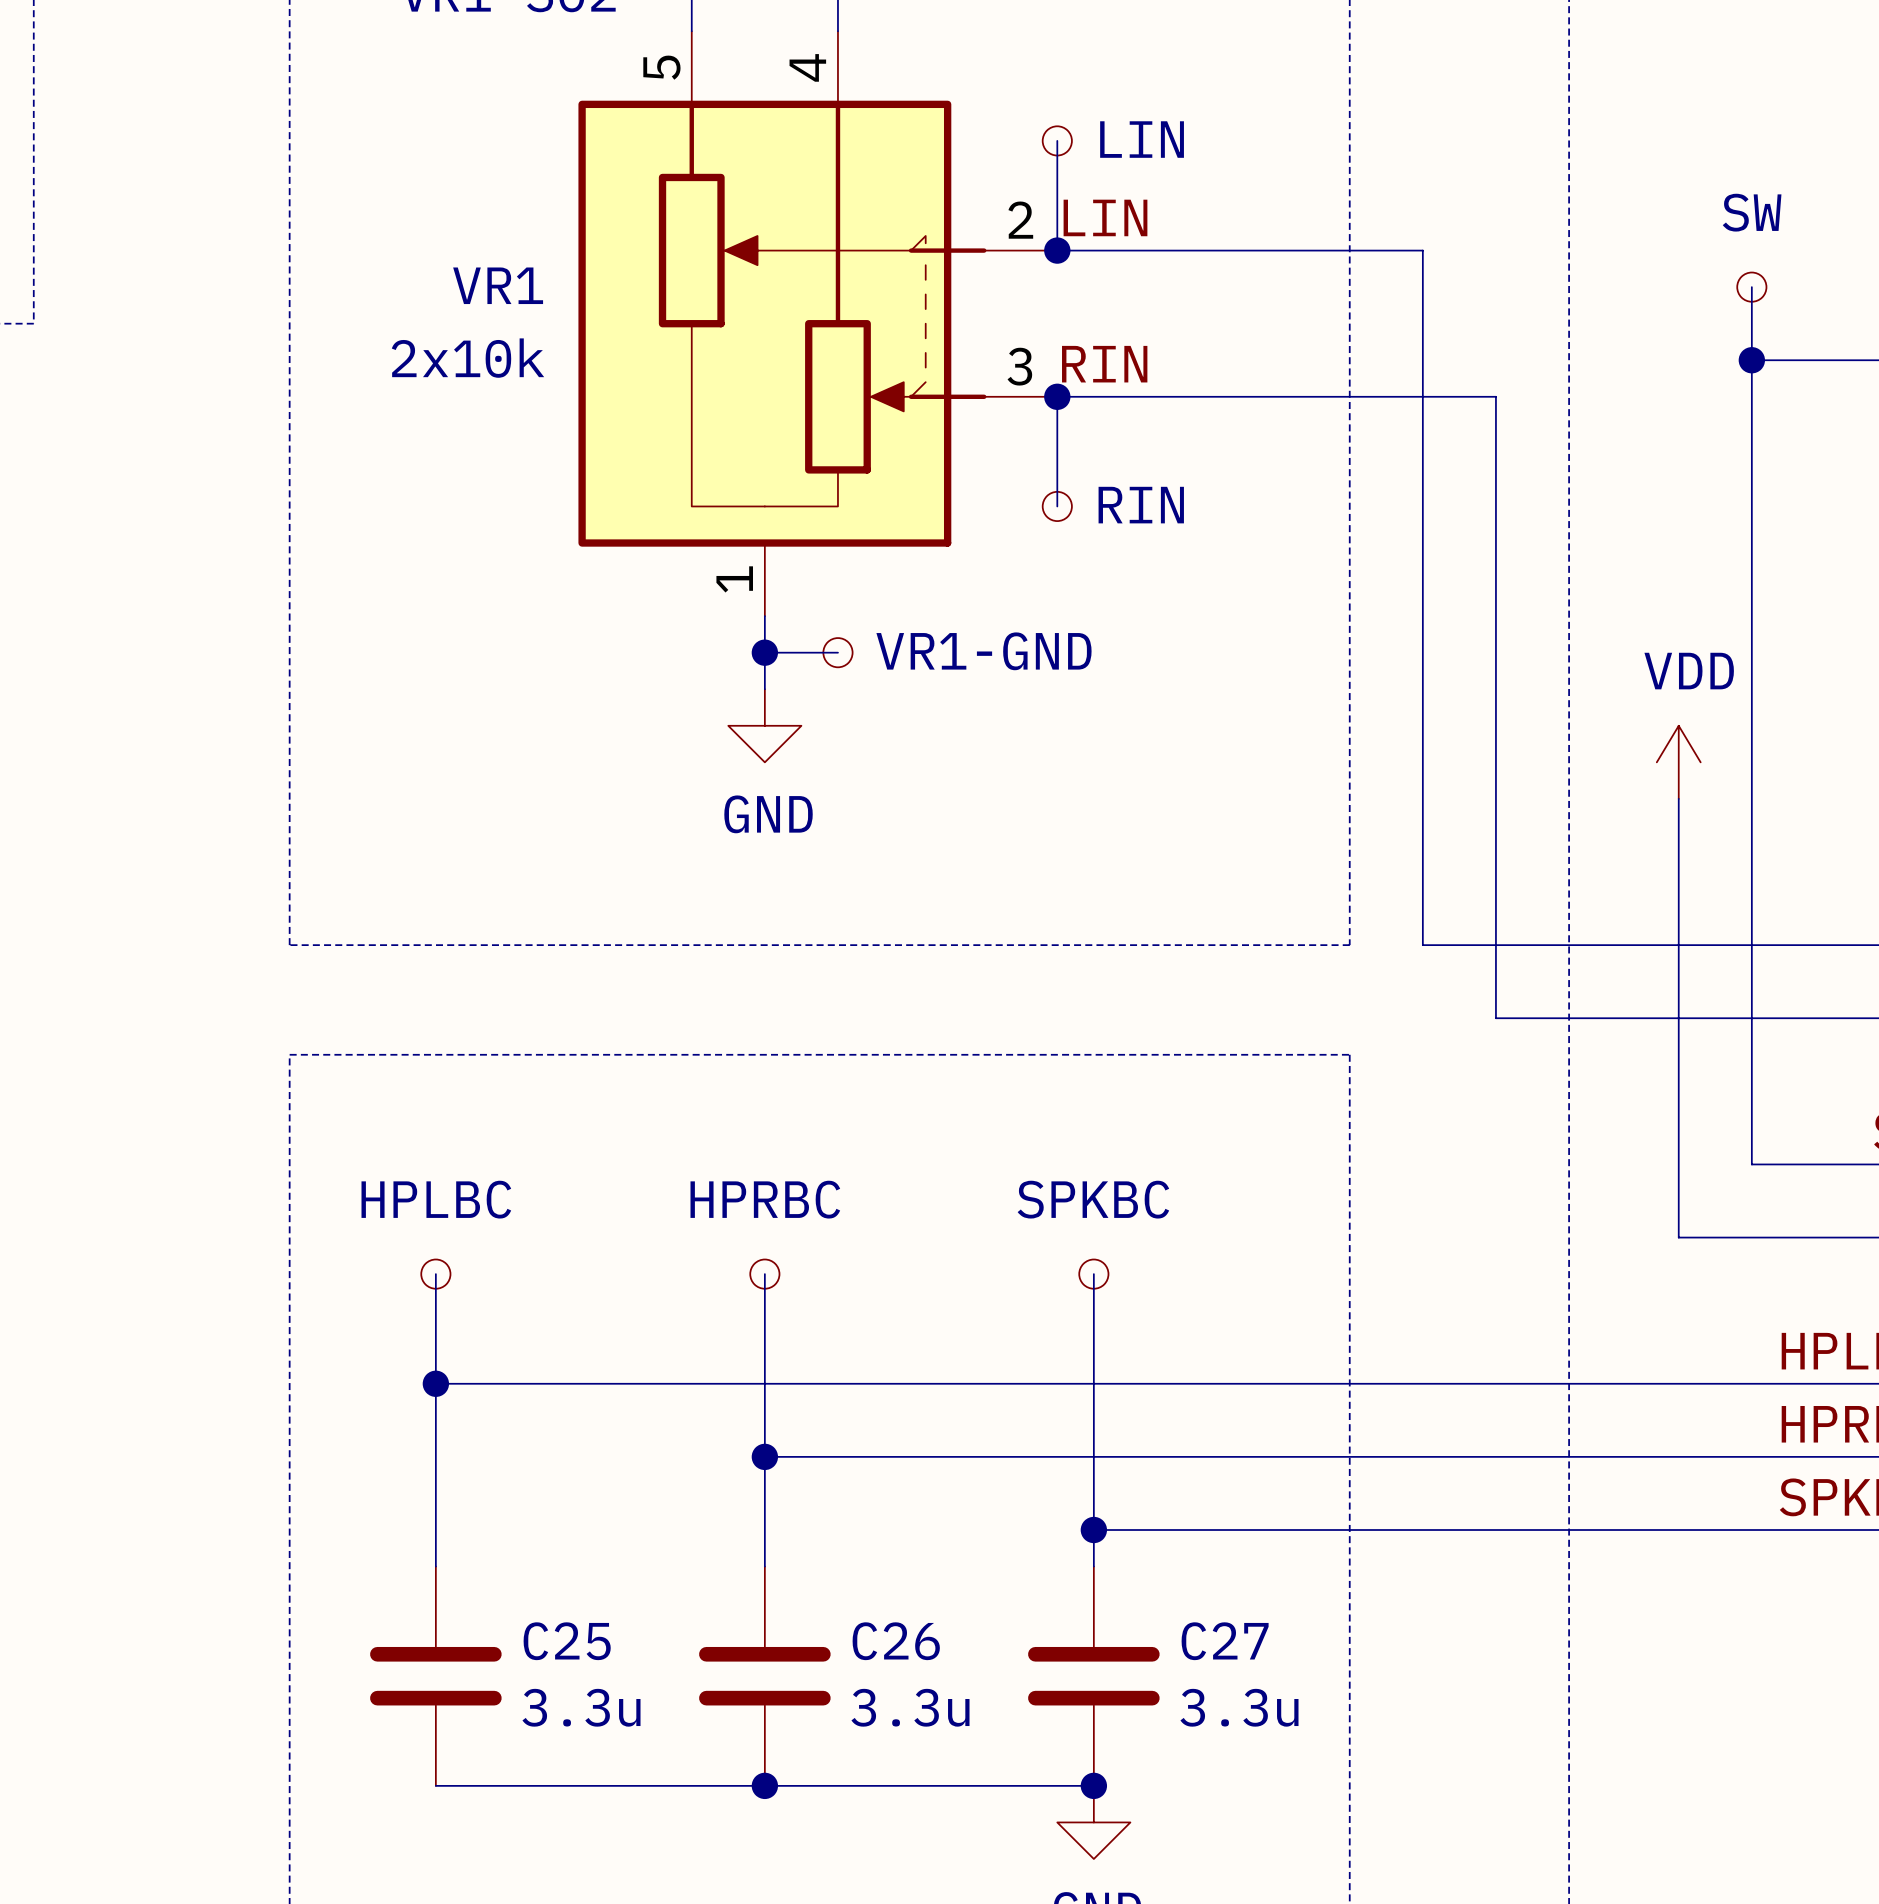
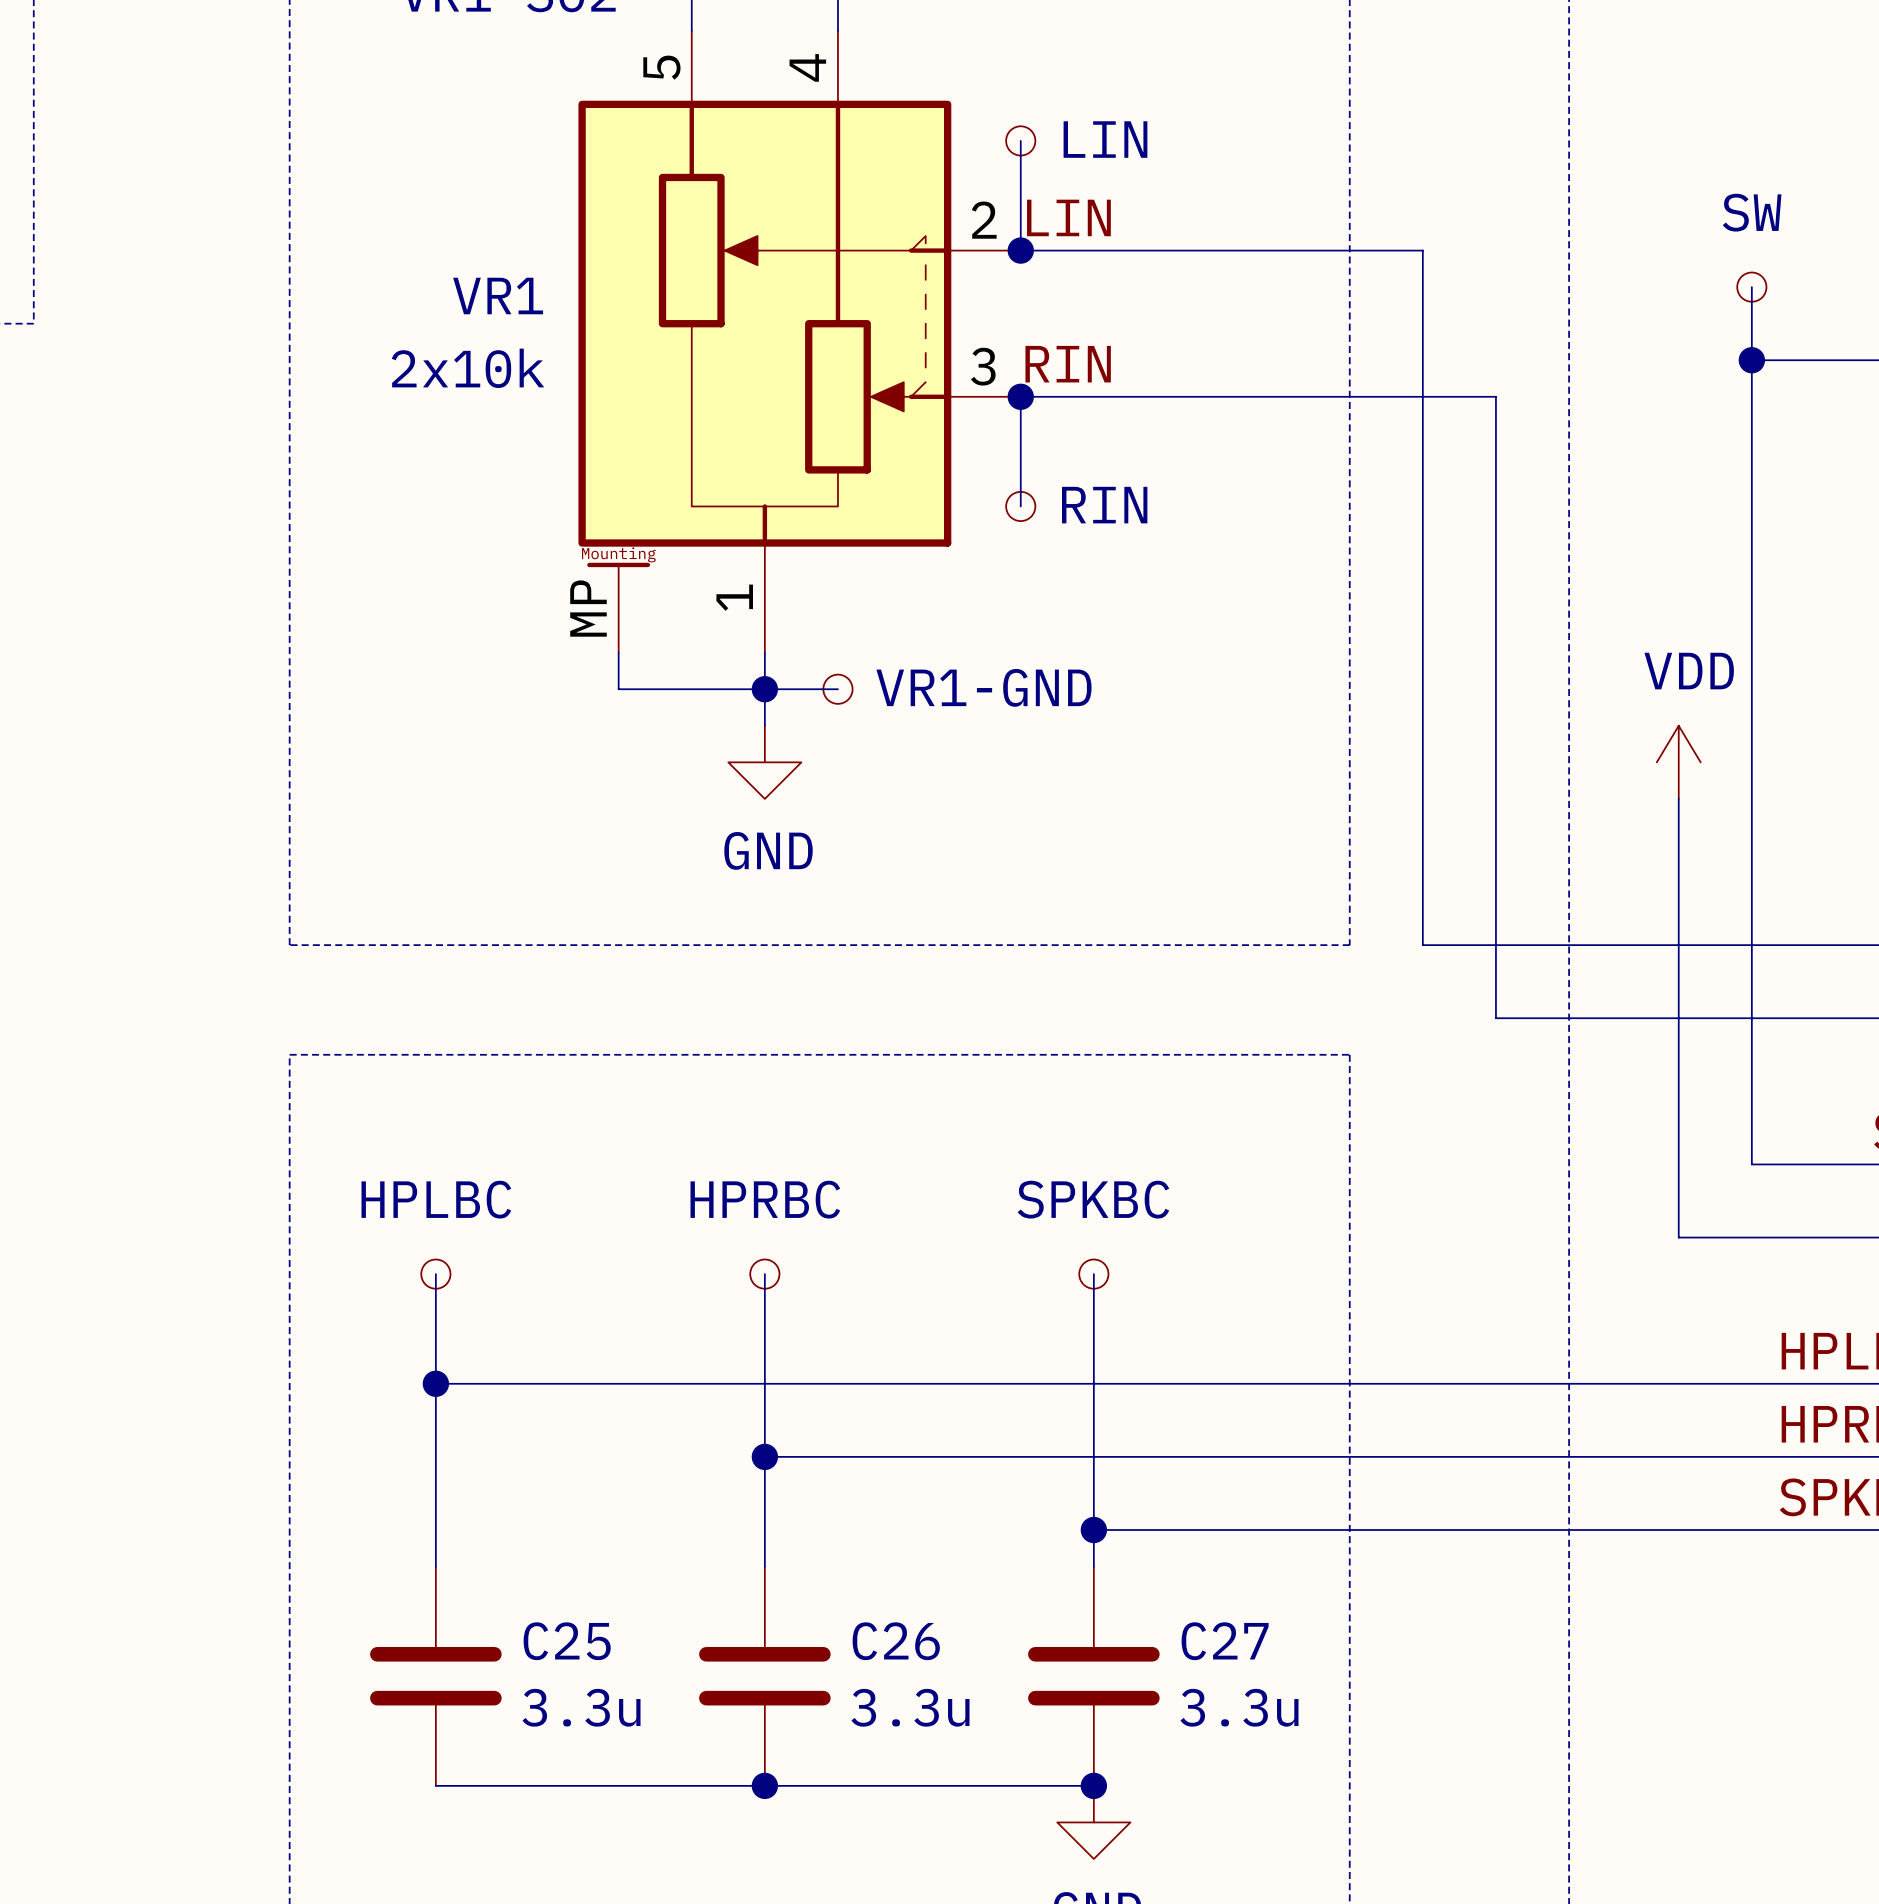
VR1 symbol: [578, 31, 1058, 617] -> [578, 31, 1021, 653]
wire: (1057, 140) (1057, 250) -> (1020, 140) (1020, 250) (1057, 250)
part position: (1057, 140) -> (1020, 140)
label position: LIN (1105, 217) -> LIN (1068, 217)
junction position: (1057, 250) -> (1020, 250)
label position: RIN (1104, 364) -> RIN (1068, 364)
wire: (1057, 396) (1057, 506) -> (1057, 396) (1020, 396) (1020, 506)
junction position: (1057, 396) -> (1020, 396)
part position: (1057, 506) -> (1020, 506)
wire: (764, 616) (764, 652) (837, 652) -> none
wire: none -> (618, 652) (618, 689) (837, 689)
junction position: (764, 652) -> (764, 689)
part position: (837, 652) -> (837, 689)
power symbol position: GND (764, 725) -> GND (764, 762)

